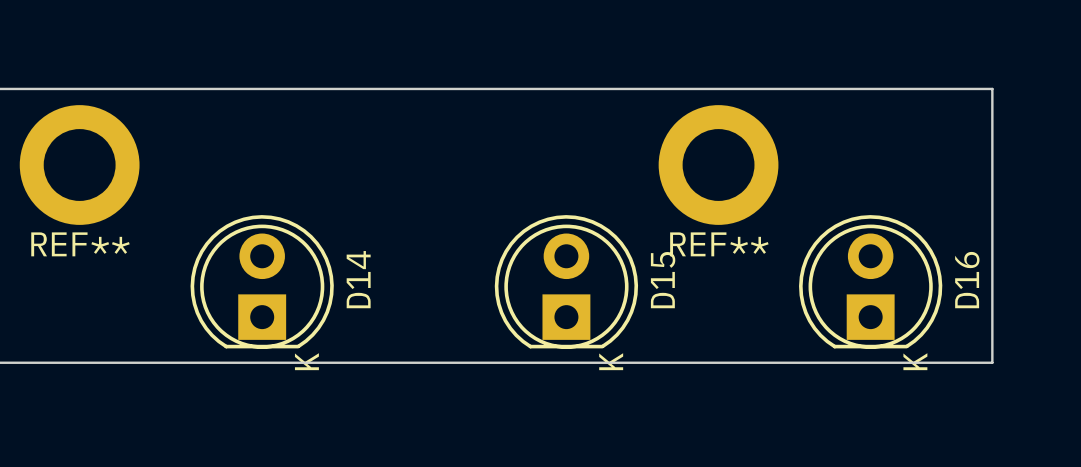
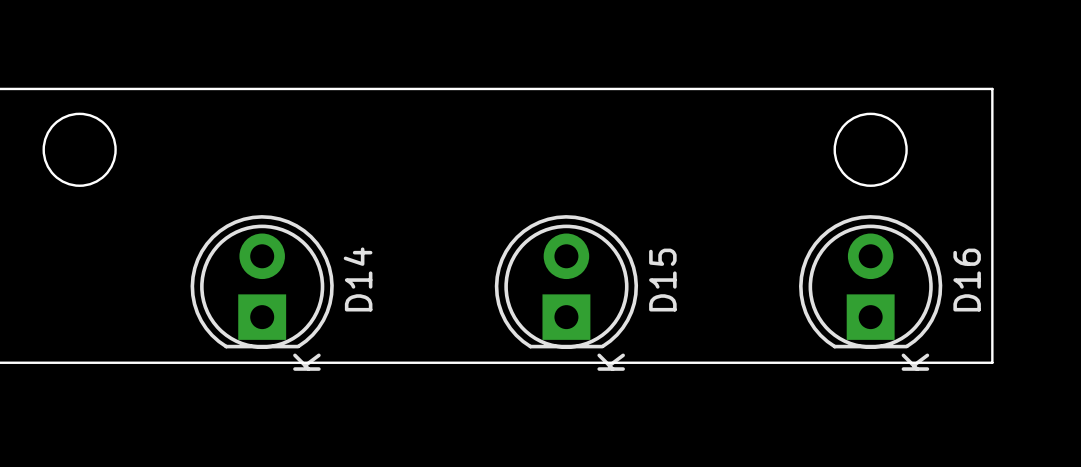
round board edge: none -> [42, 112, 117, 187]
round board edge: none -> [833, 112, 908, 187]
REF**: (79, 165) -> none
REF**: (718, 165) -> none

